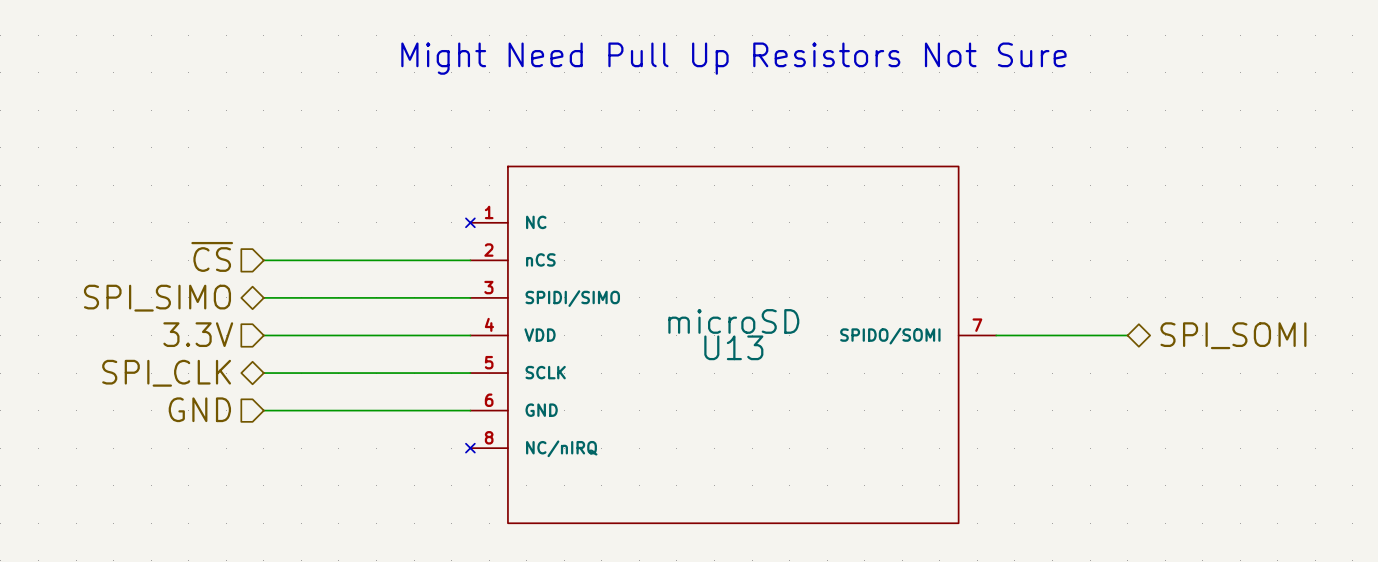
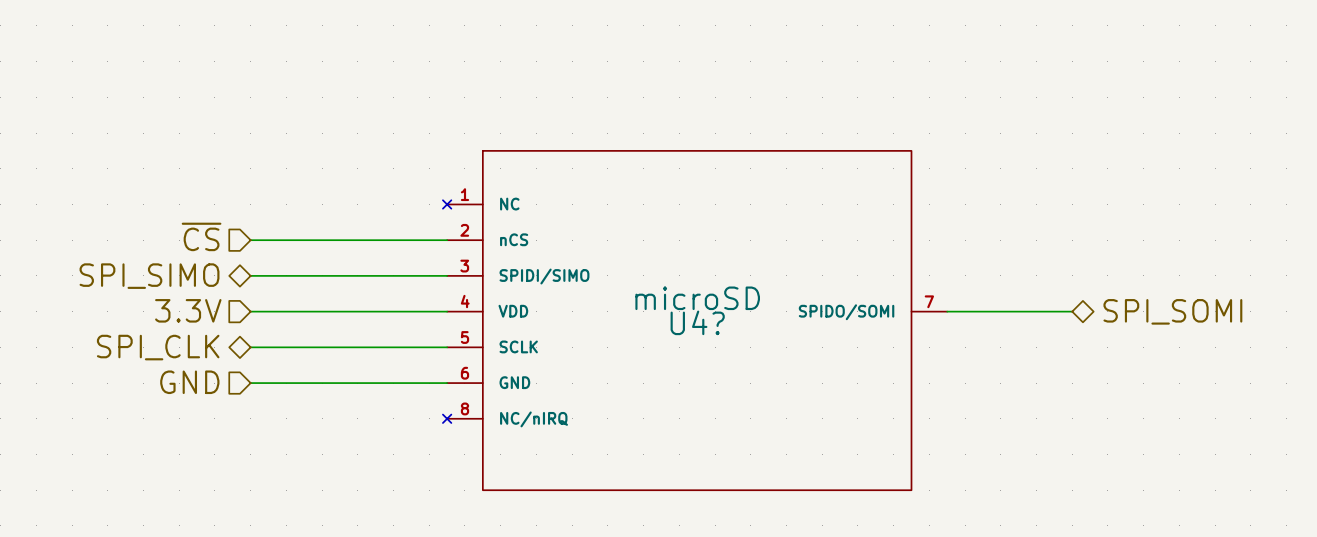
text: Might Need Pull Up Resistors Not Sure (733, 58) -> none
U13 name: U13 (733, 347) -> U4? (697, 322)

